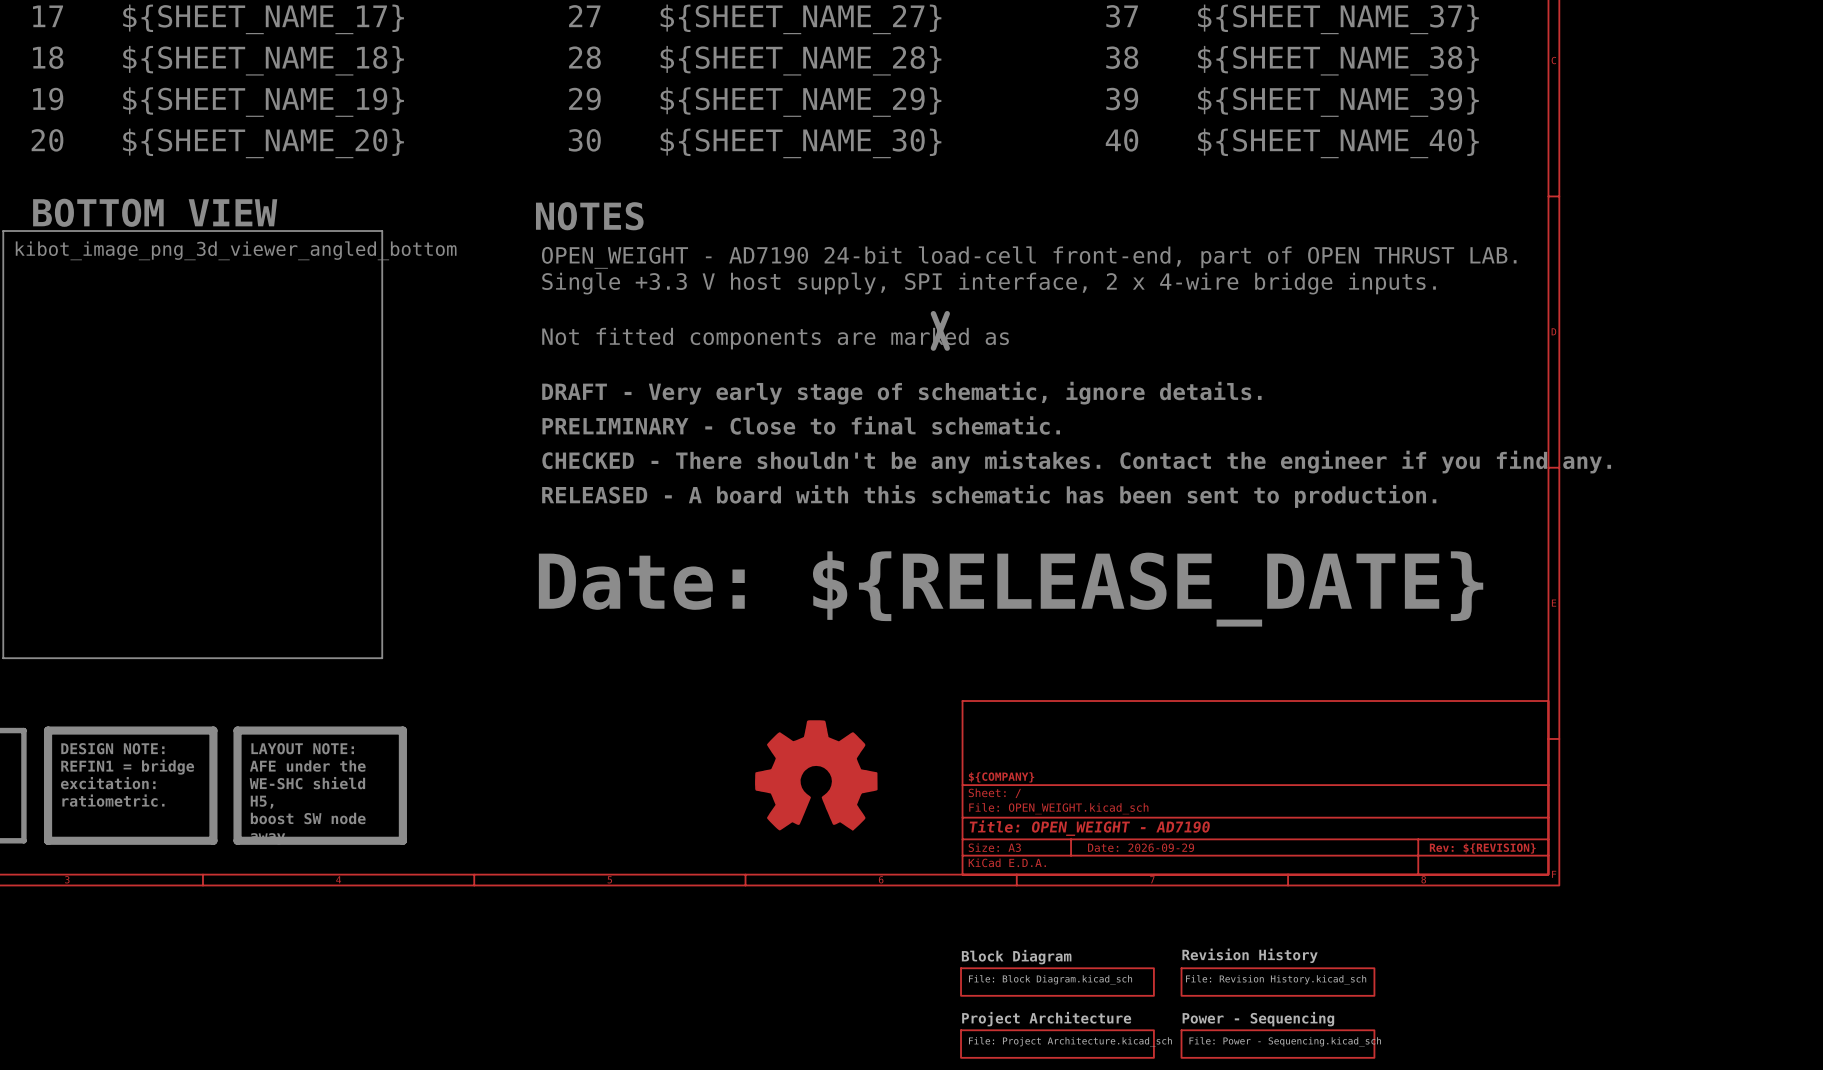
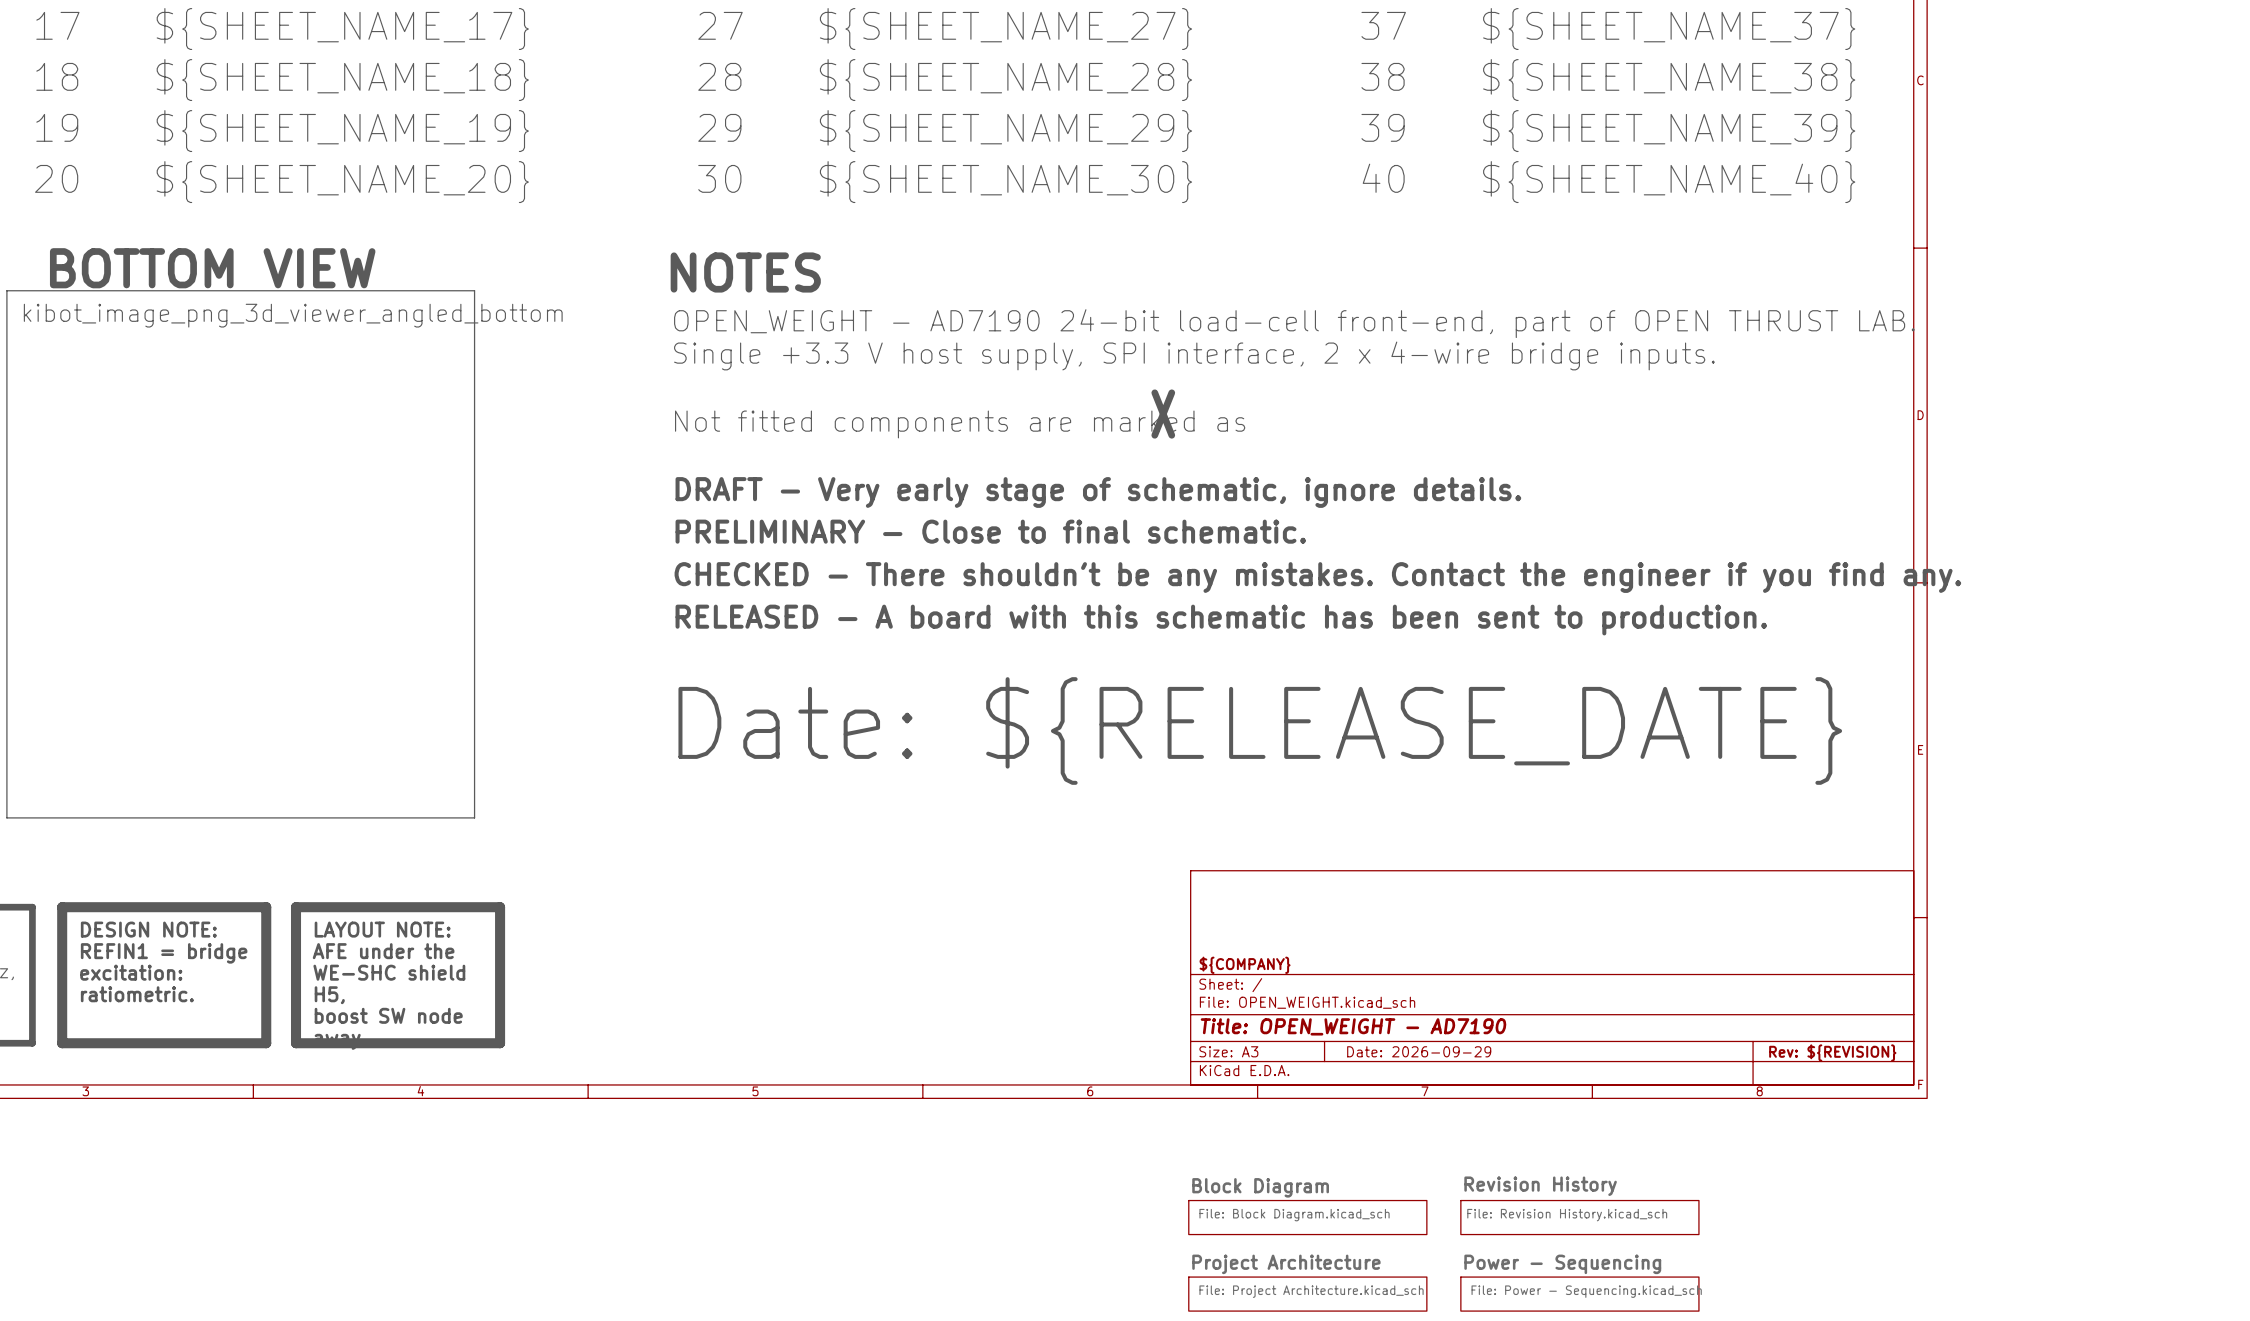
power symbol: (816, 775) -> none

